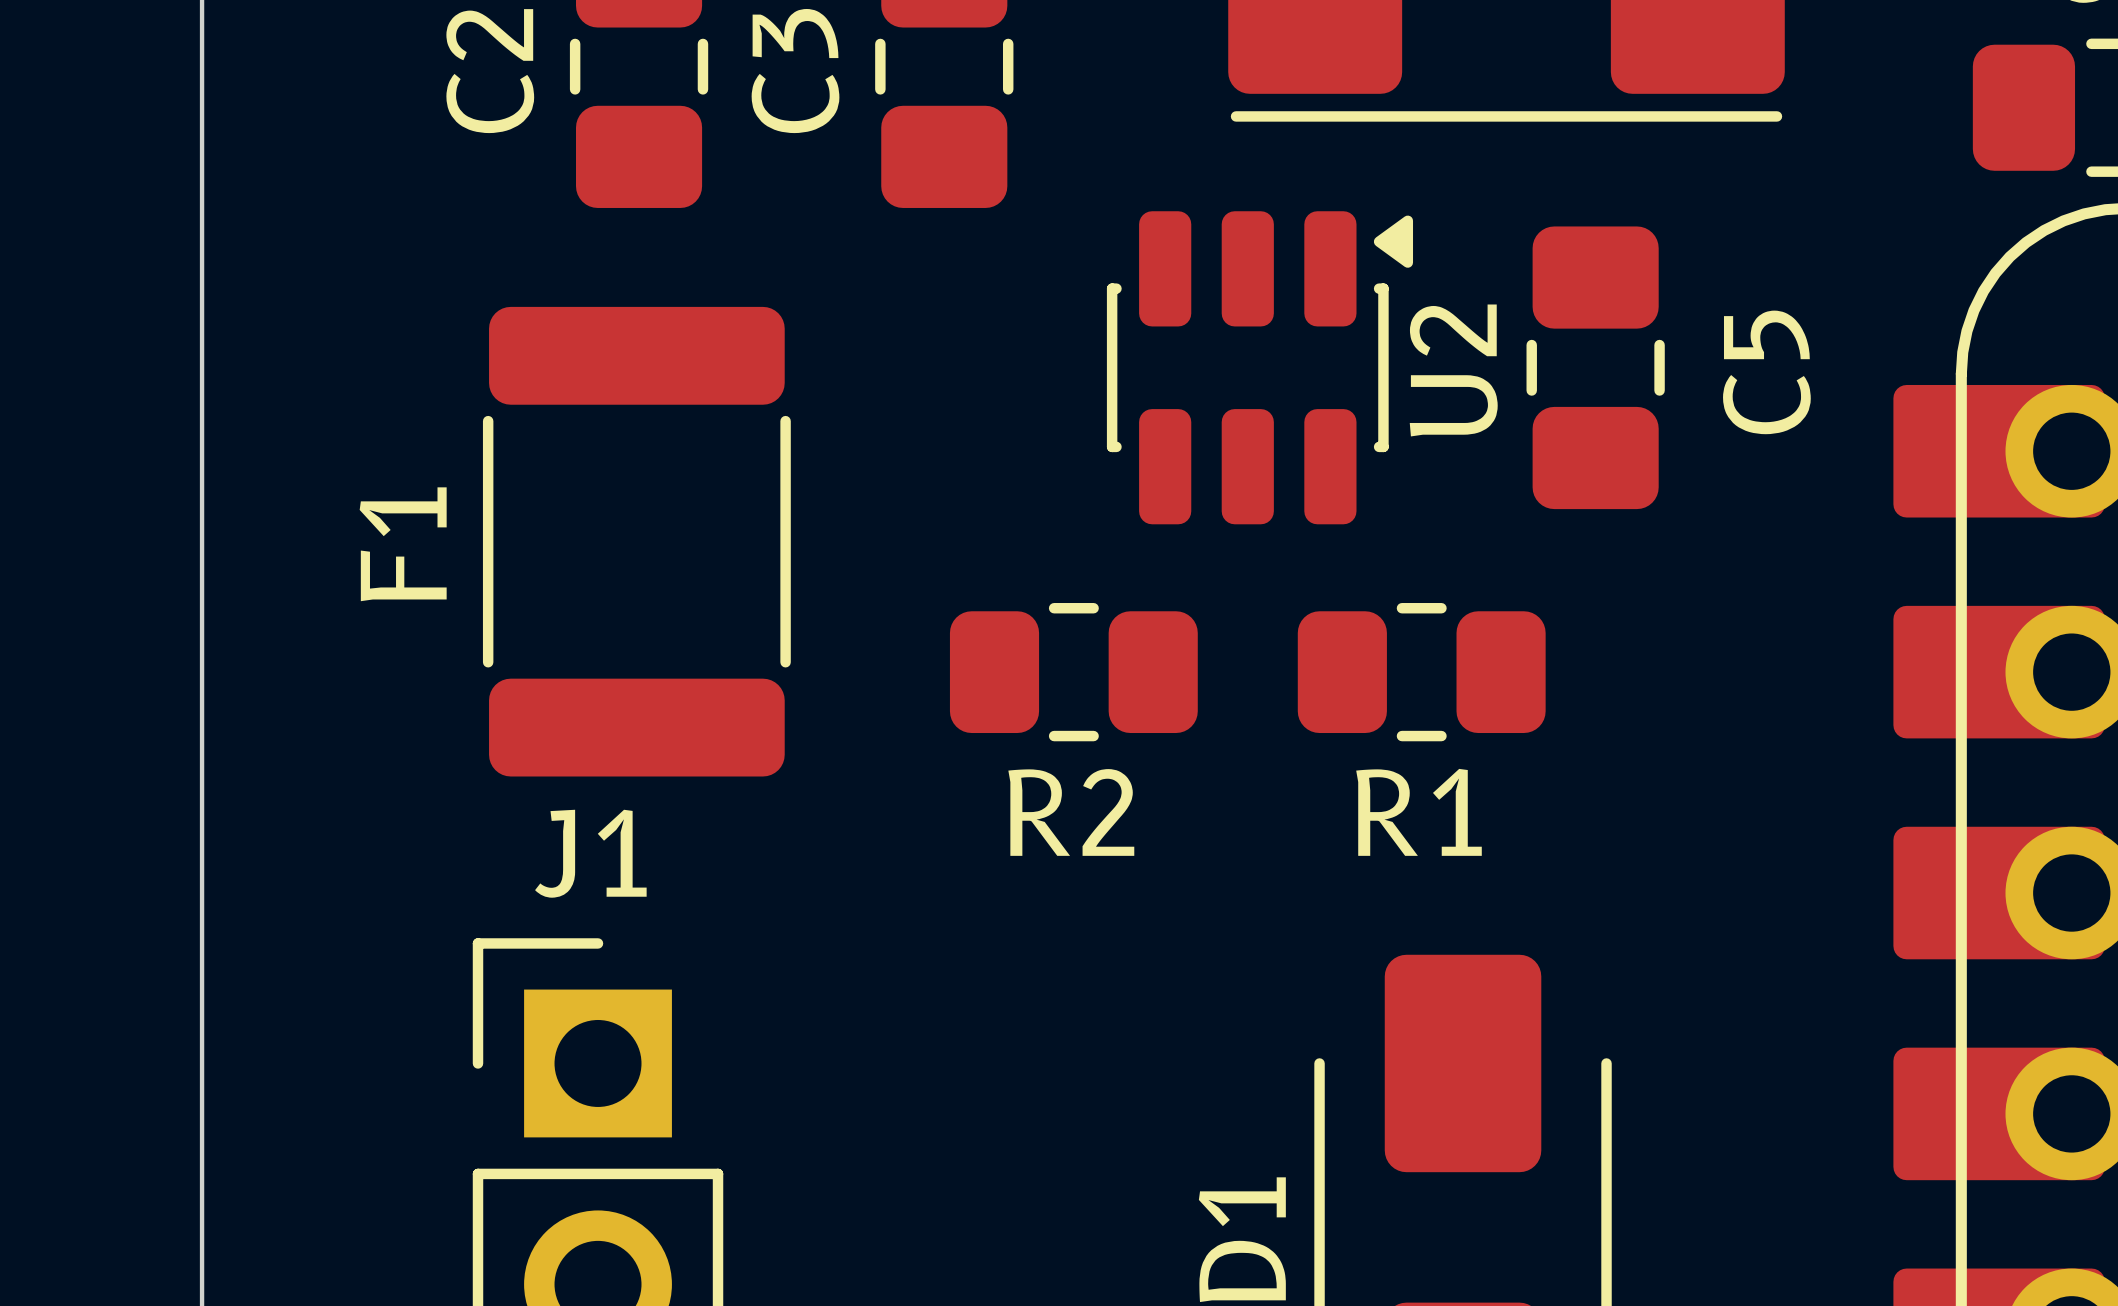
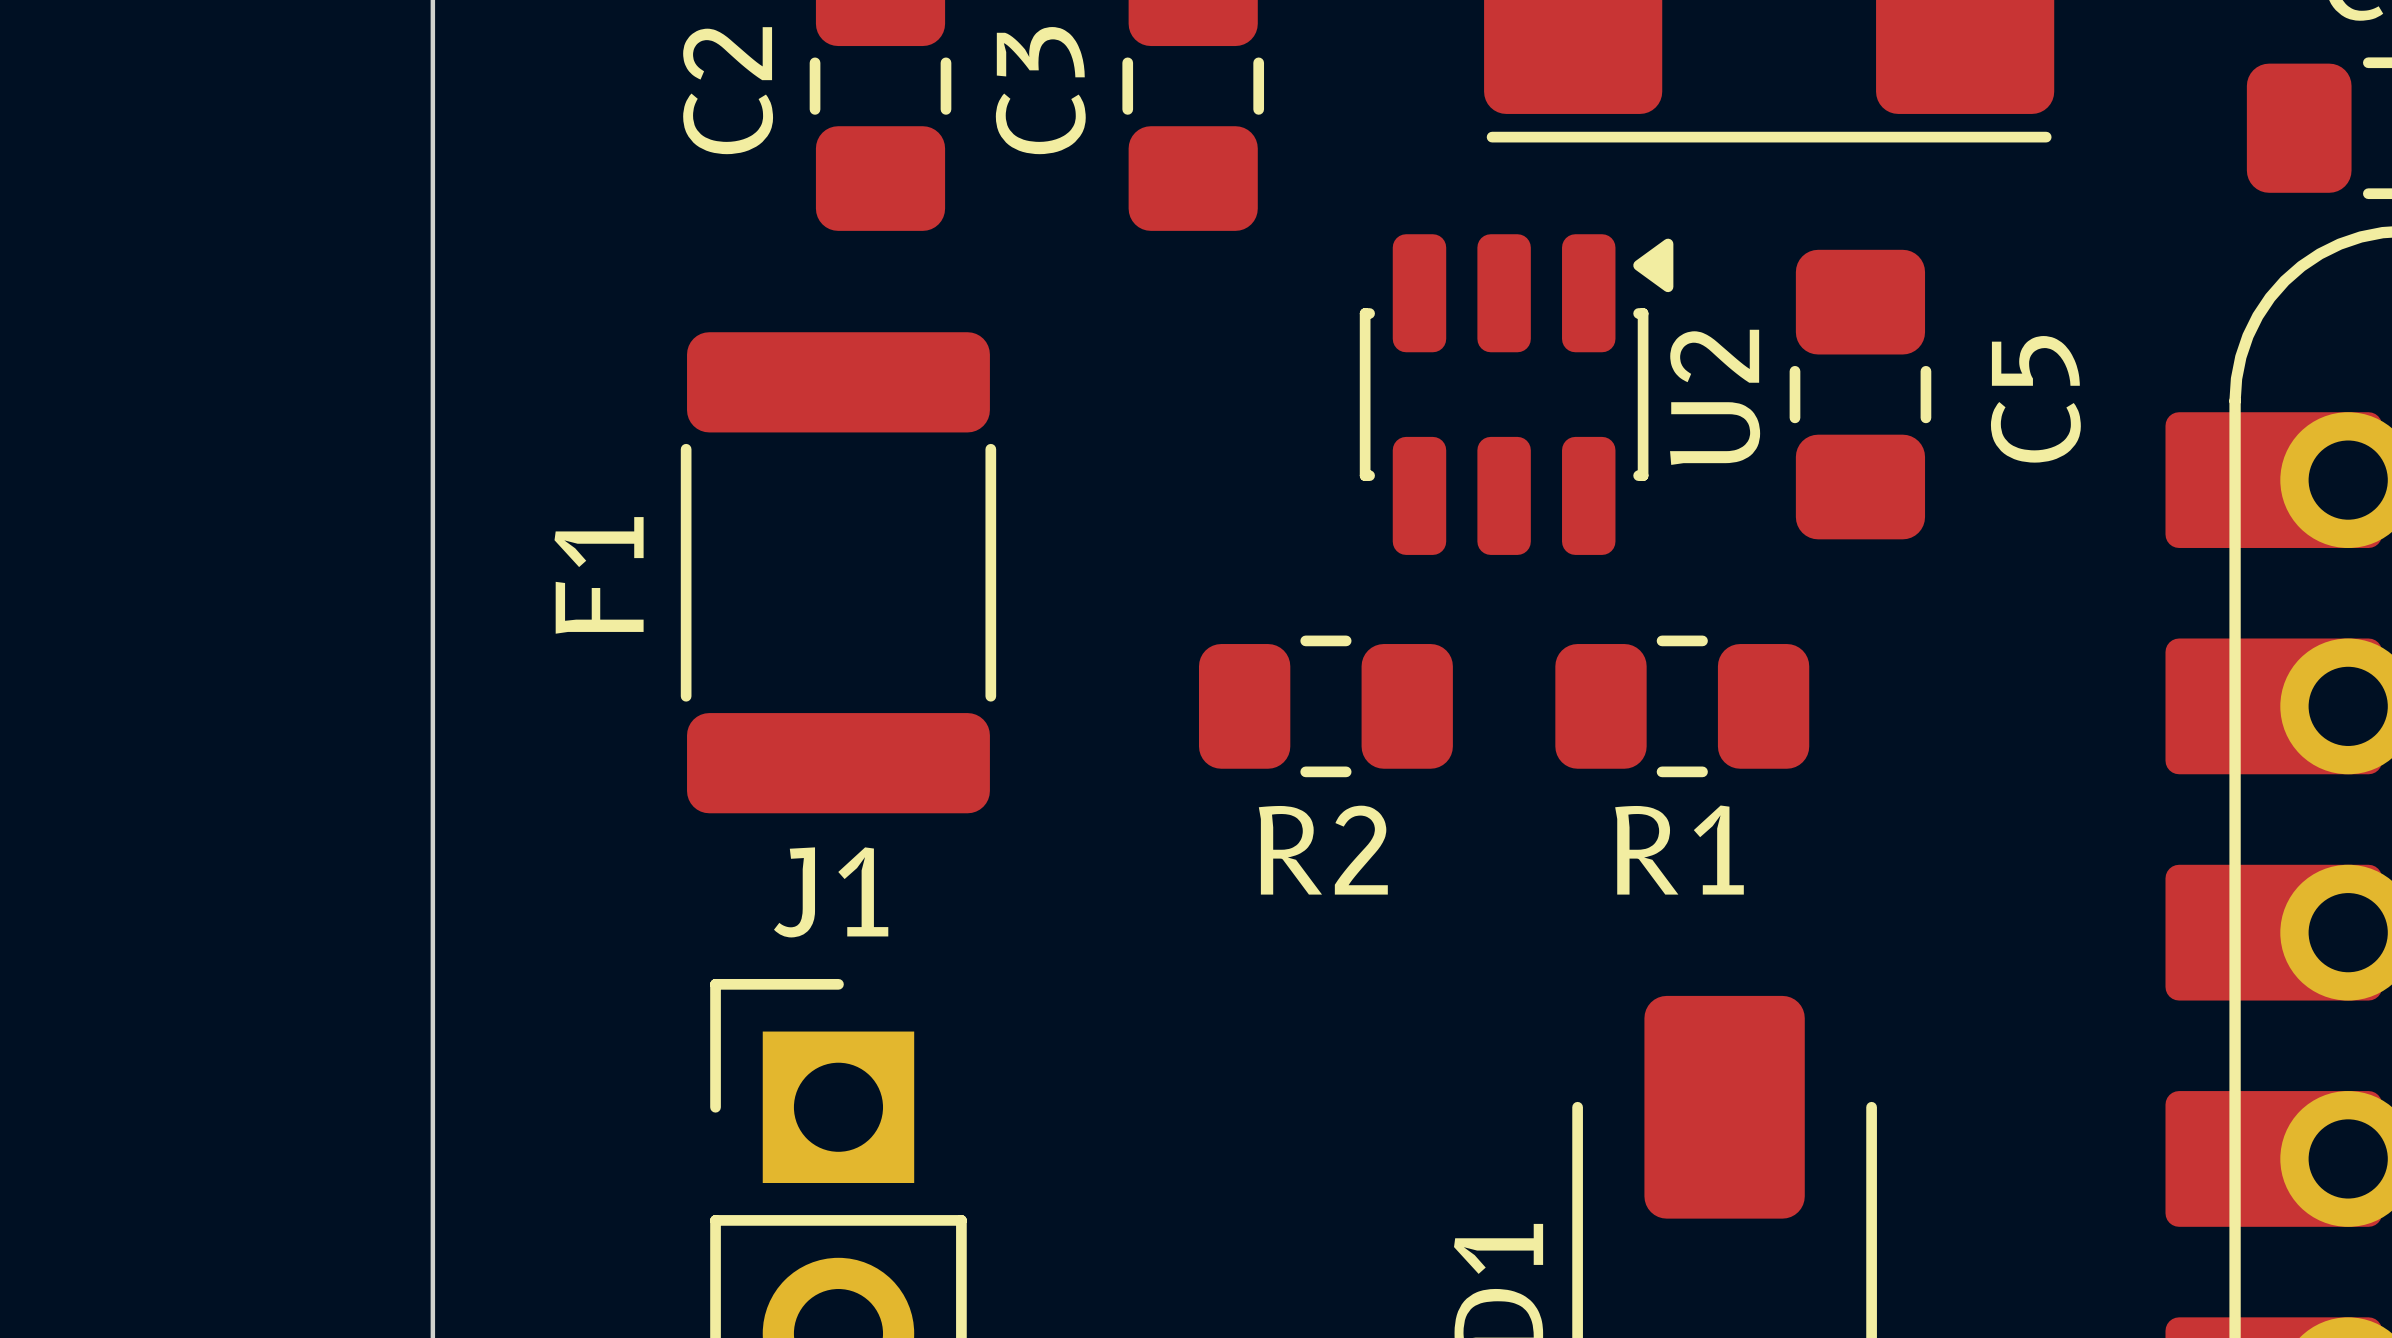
F1 position: (636, 541) -> (838, 572)

